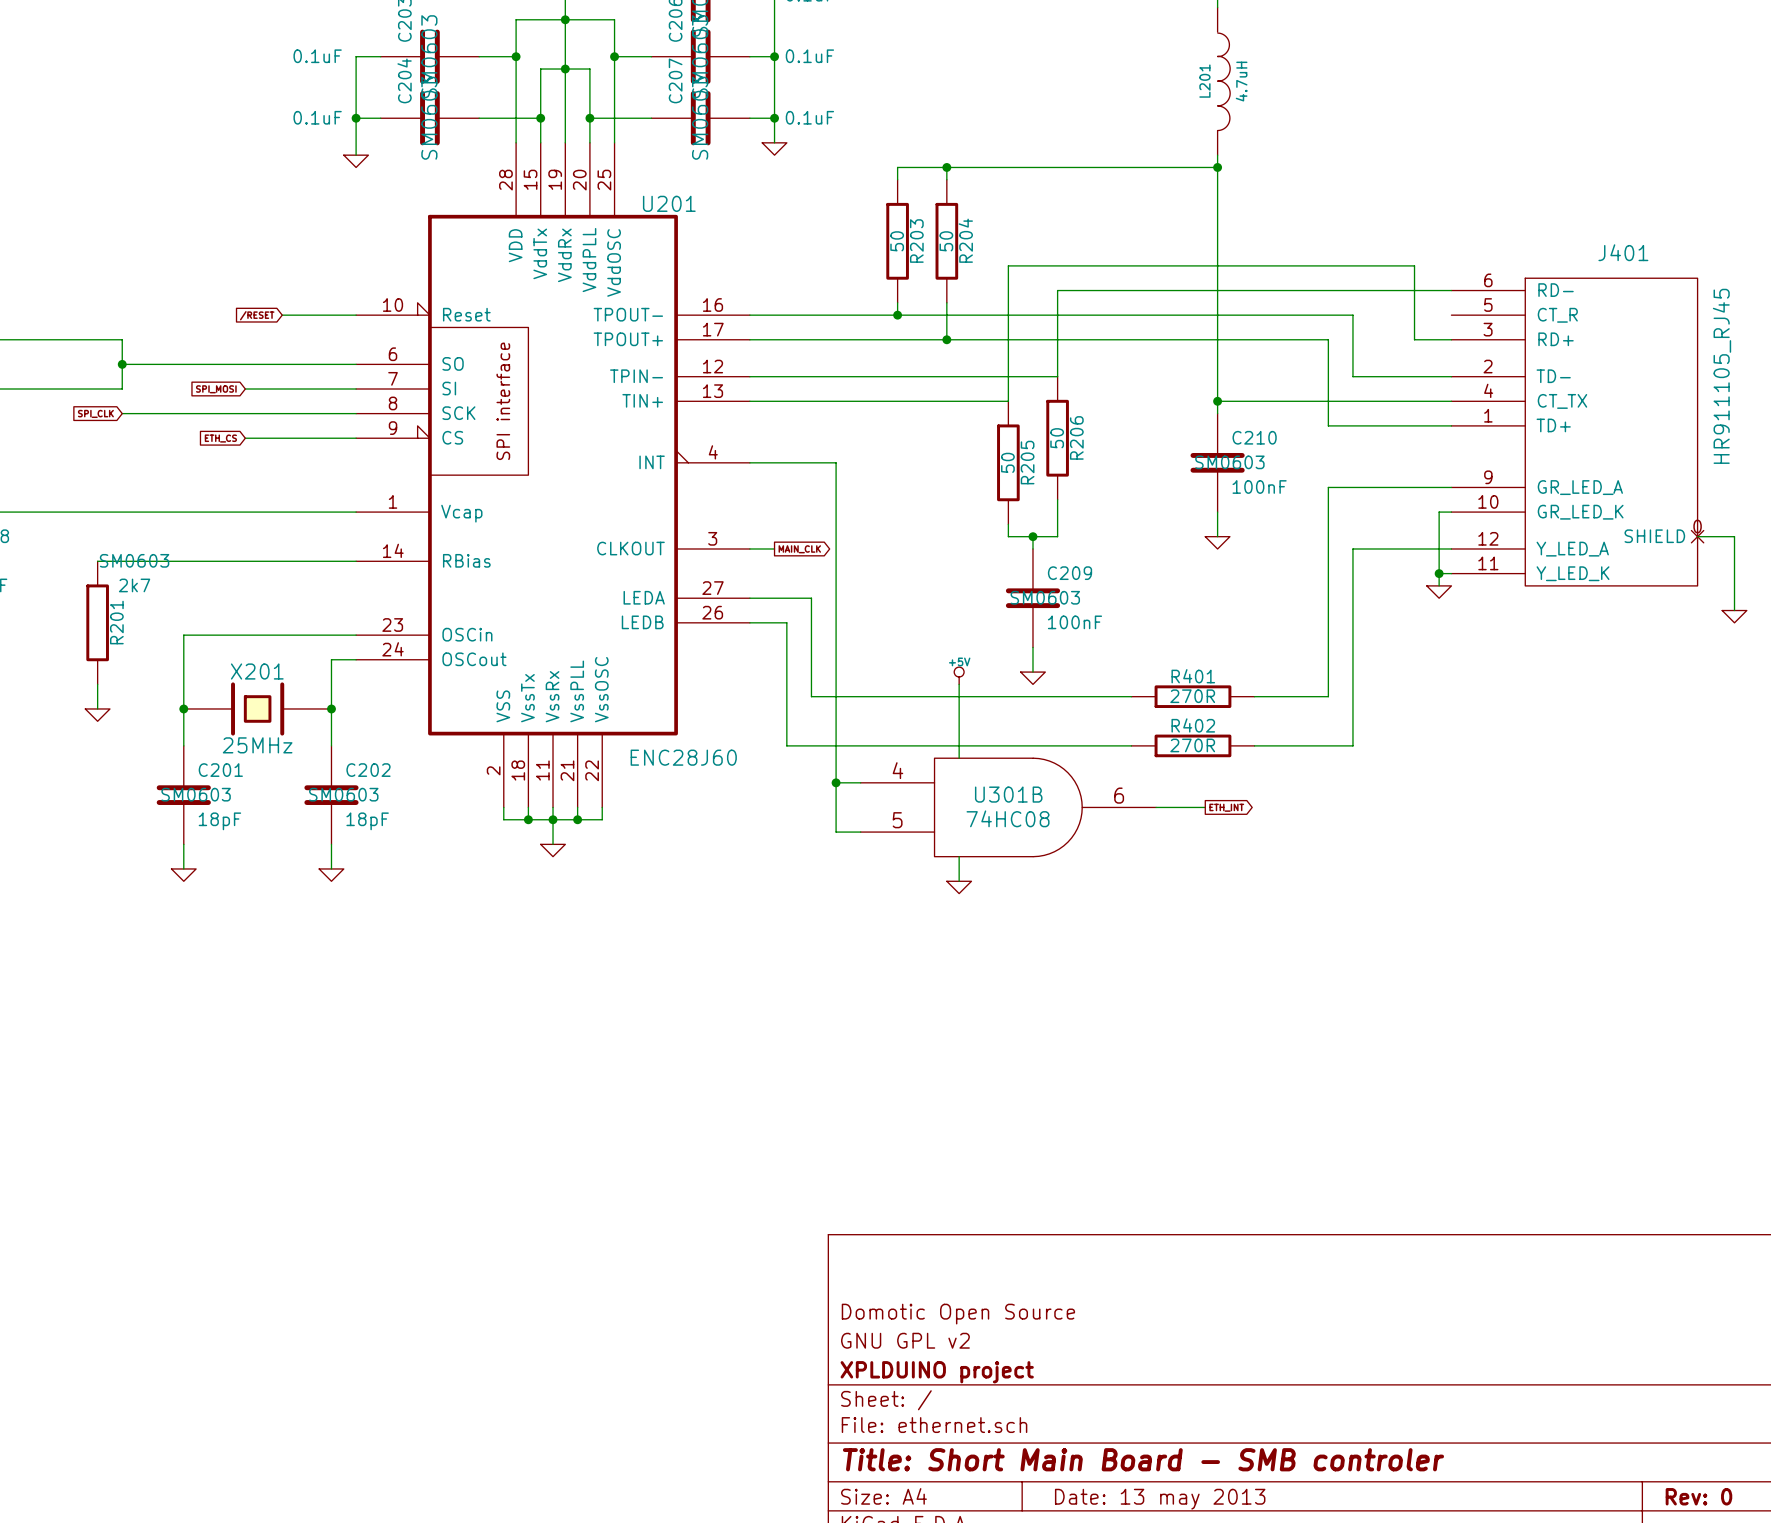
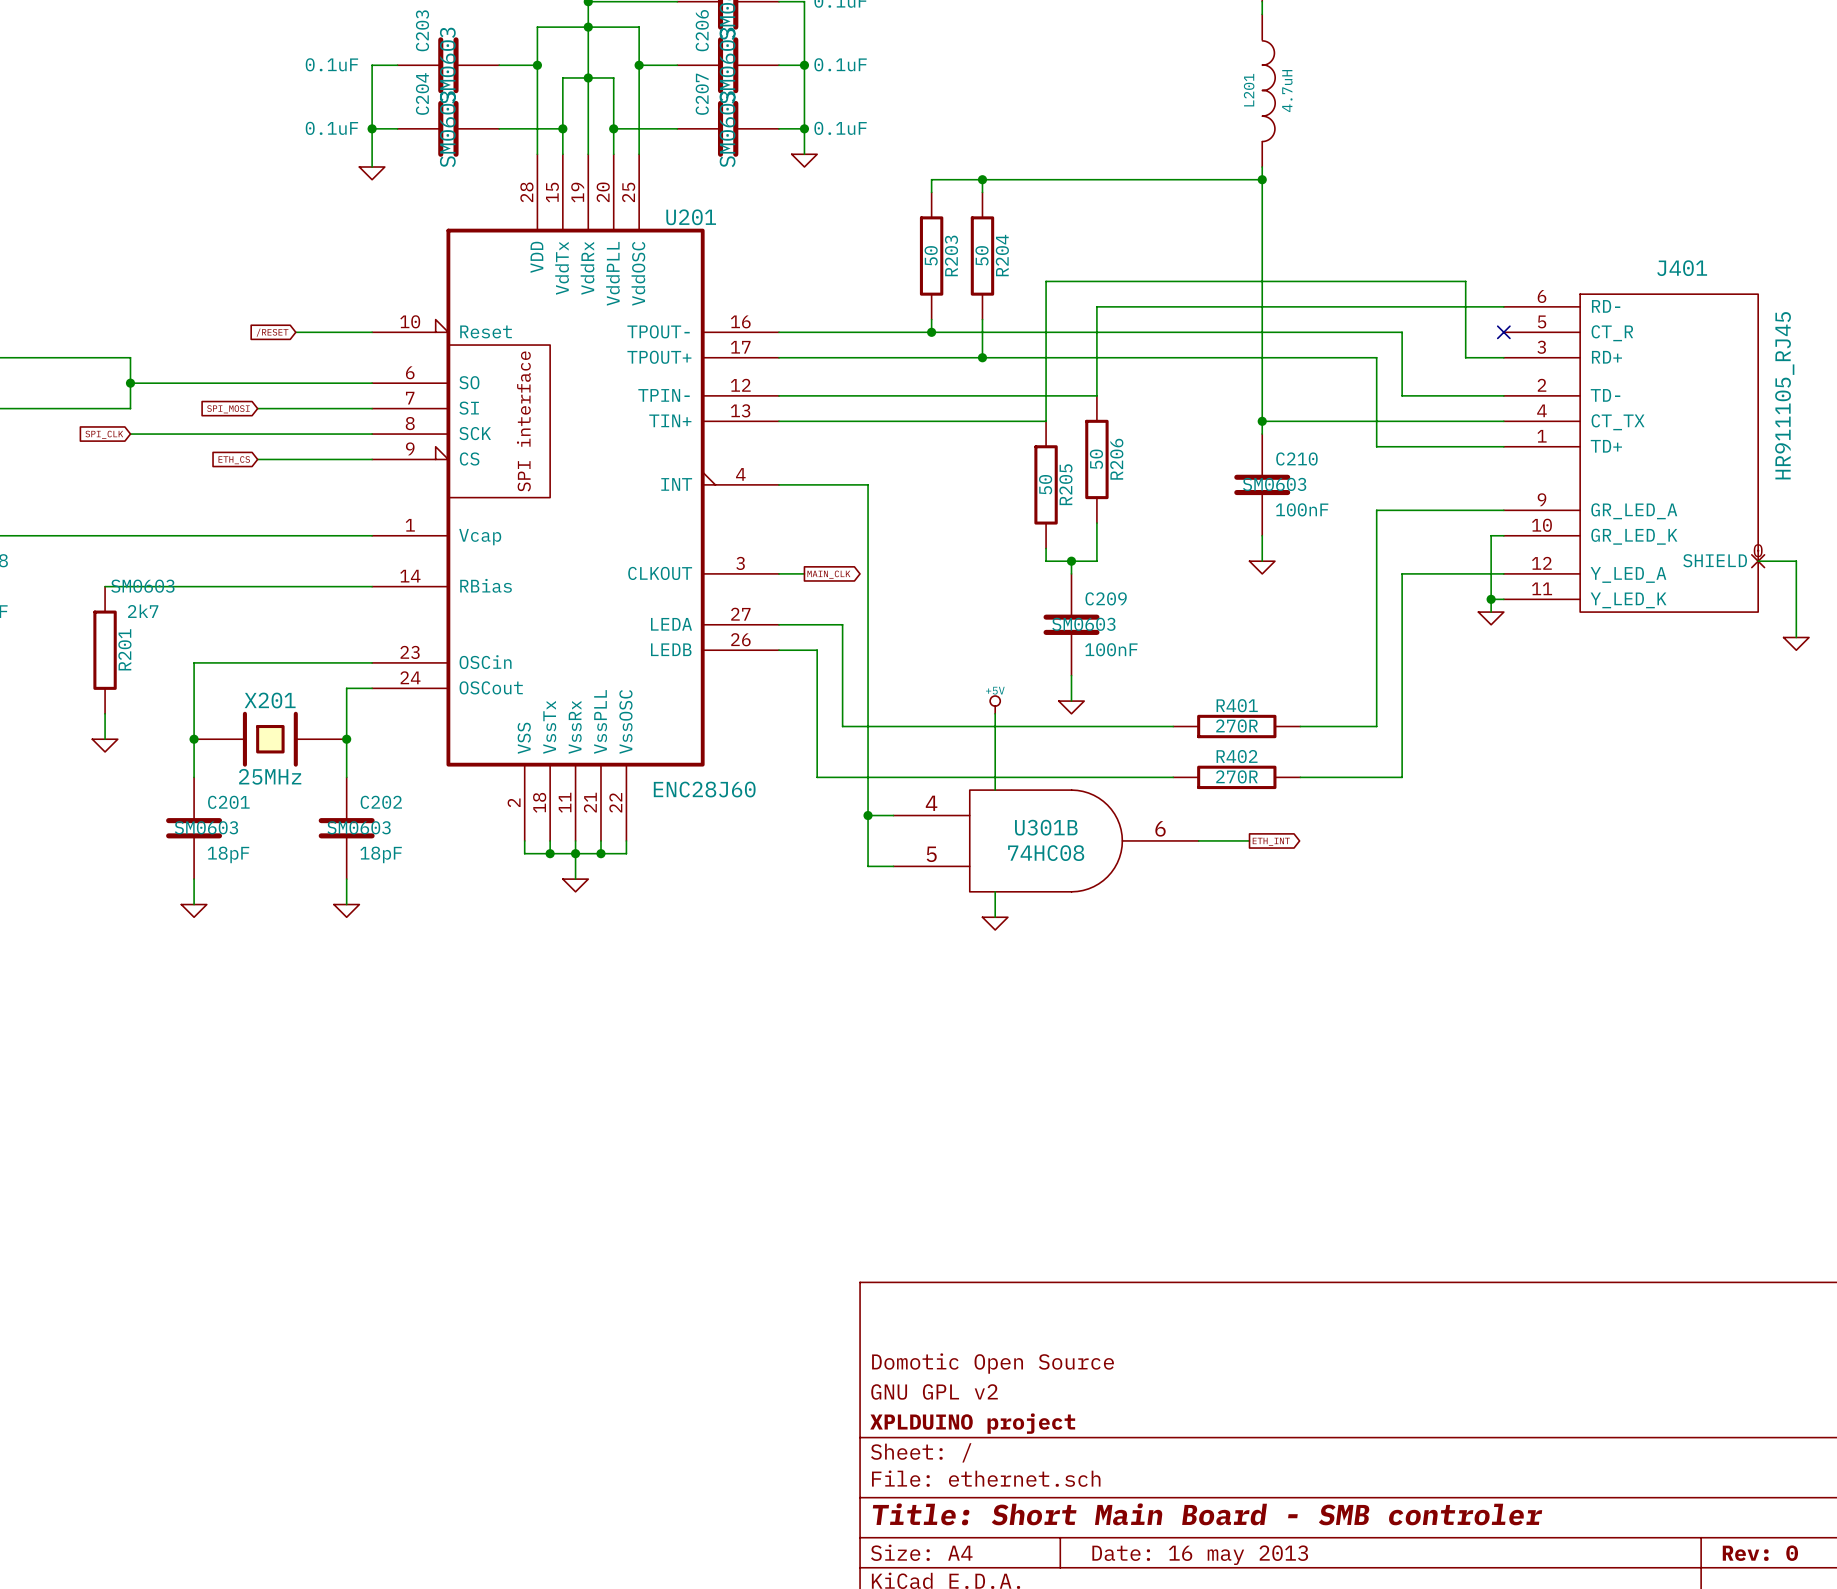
no-connect mark: none -> (1503, 332)
title block: Date: 13 may 2013 (1160, 1499) -> Date: 16 may 2013 (1200, 1555)

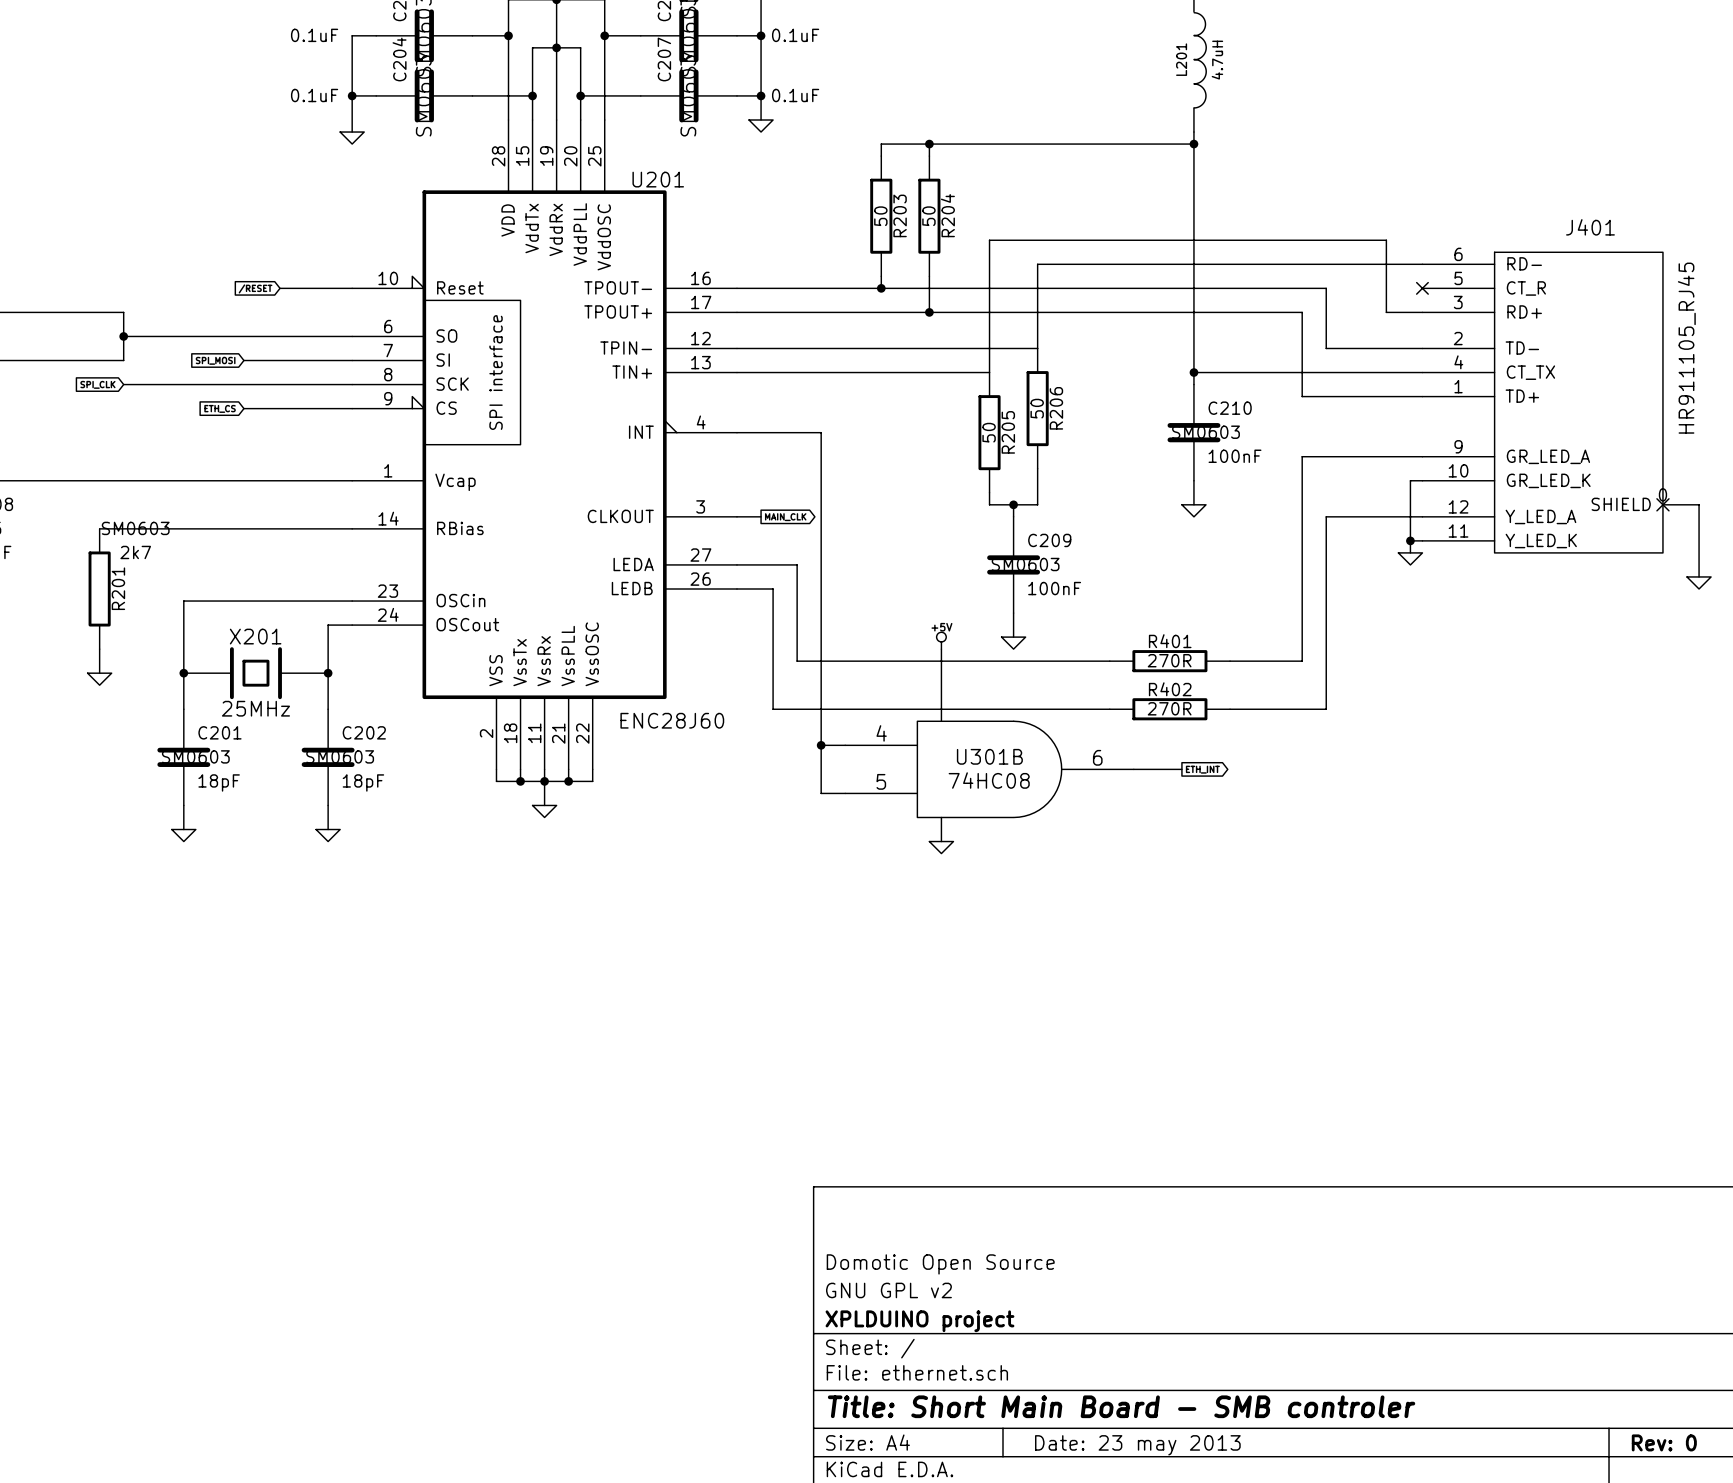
title block: Date: 16 may 2013 (1200, 1555) -> Date: 23 may 2013 (1137, 1445)

